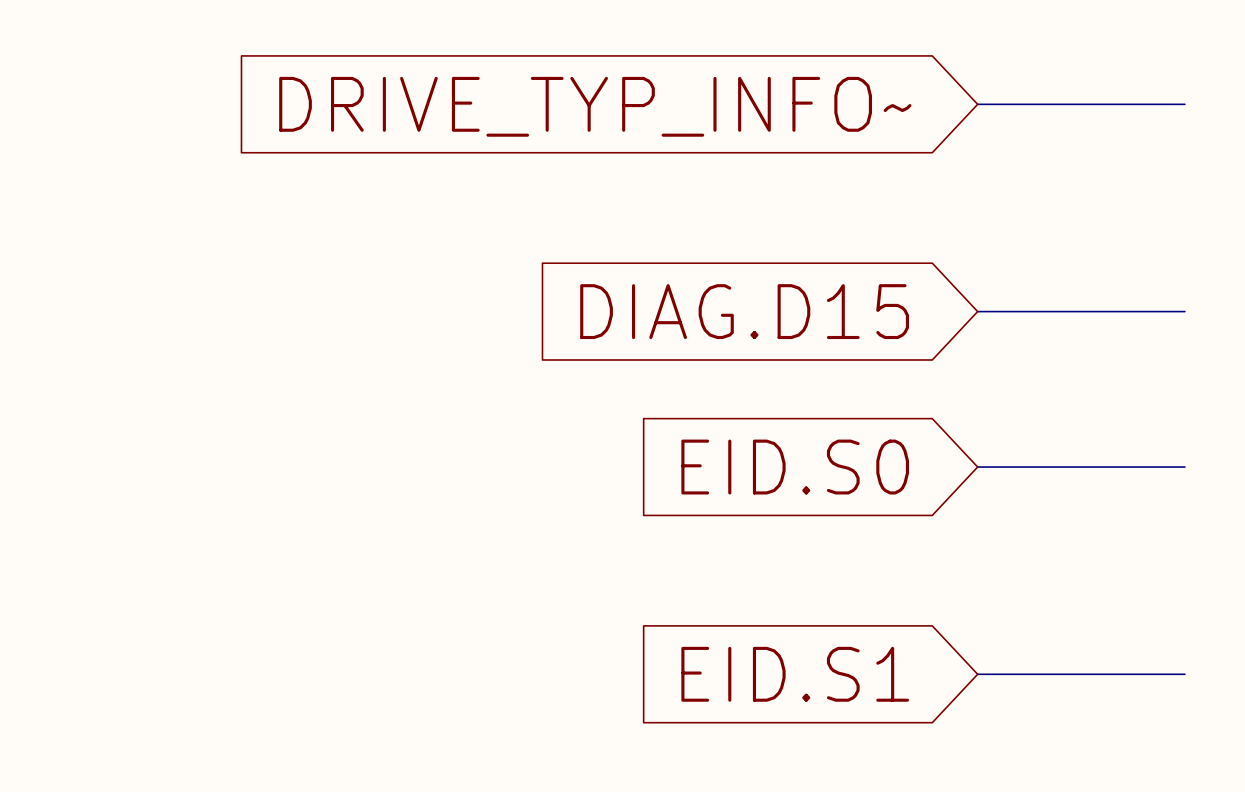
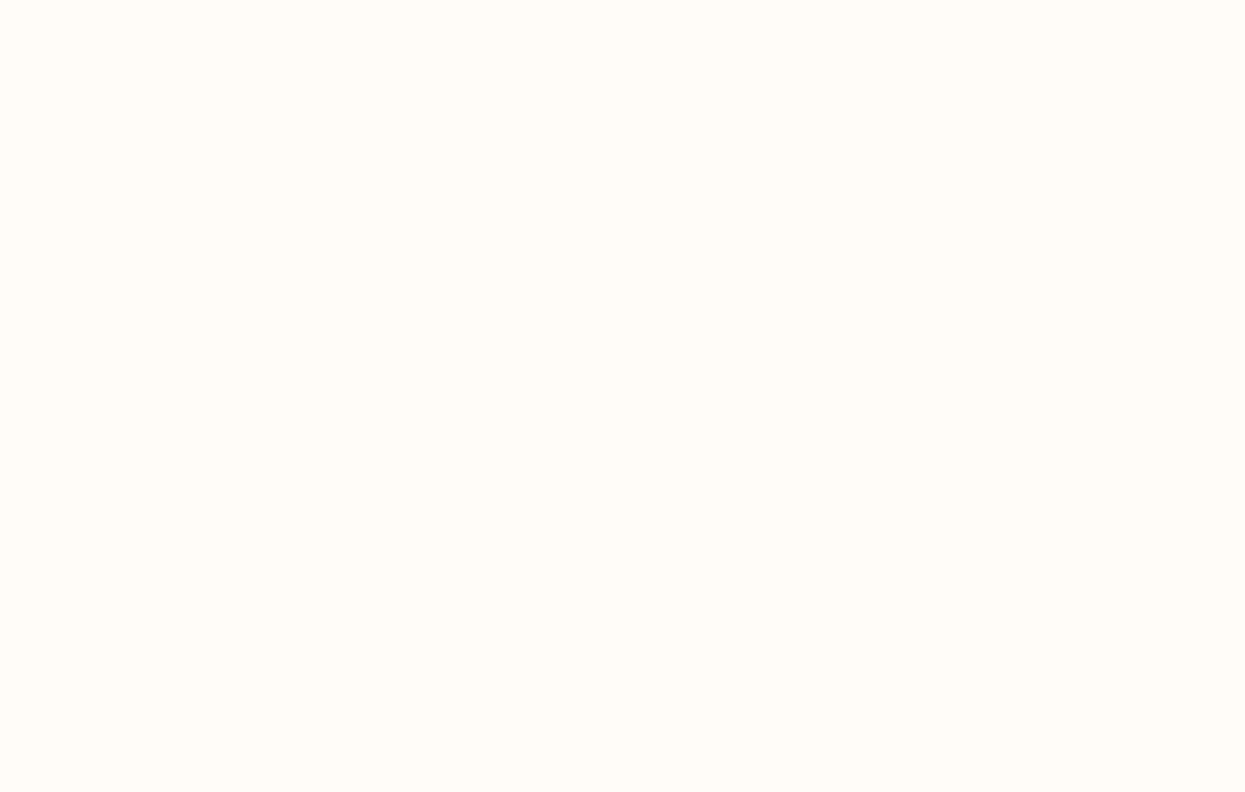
wire: (977, 104) (1184, 104) -> none
global label: DRIVE_TYP_INFO~ (595, 106) -> none
global label: DIAG.D15 (744, 311) -> none
wire: (977, 311) (1184, 311) -> none
global label: EID.S0 (795, 467) -> none
wire: (977, 467) (1184, 467) -> none
global label: EID.S1 (795, 674) -> none
wire: (977, 674) (1184, 674) -> none

